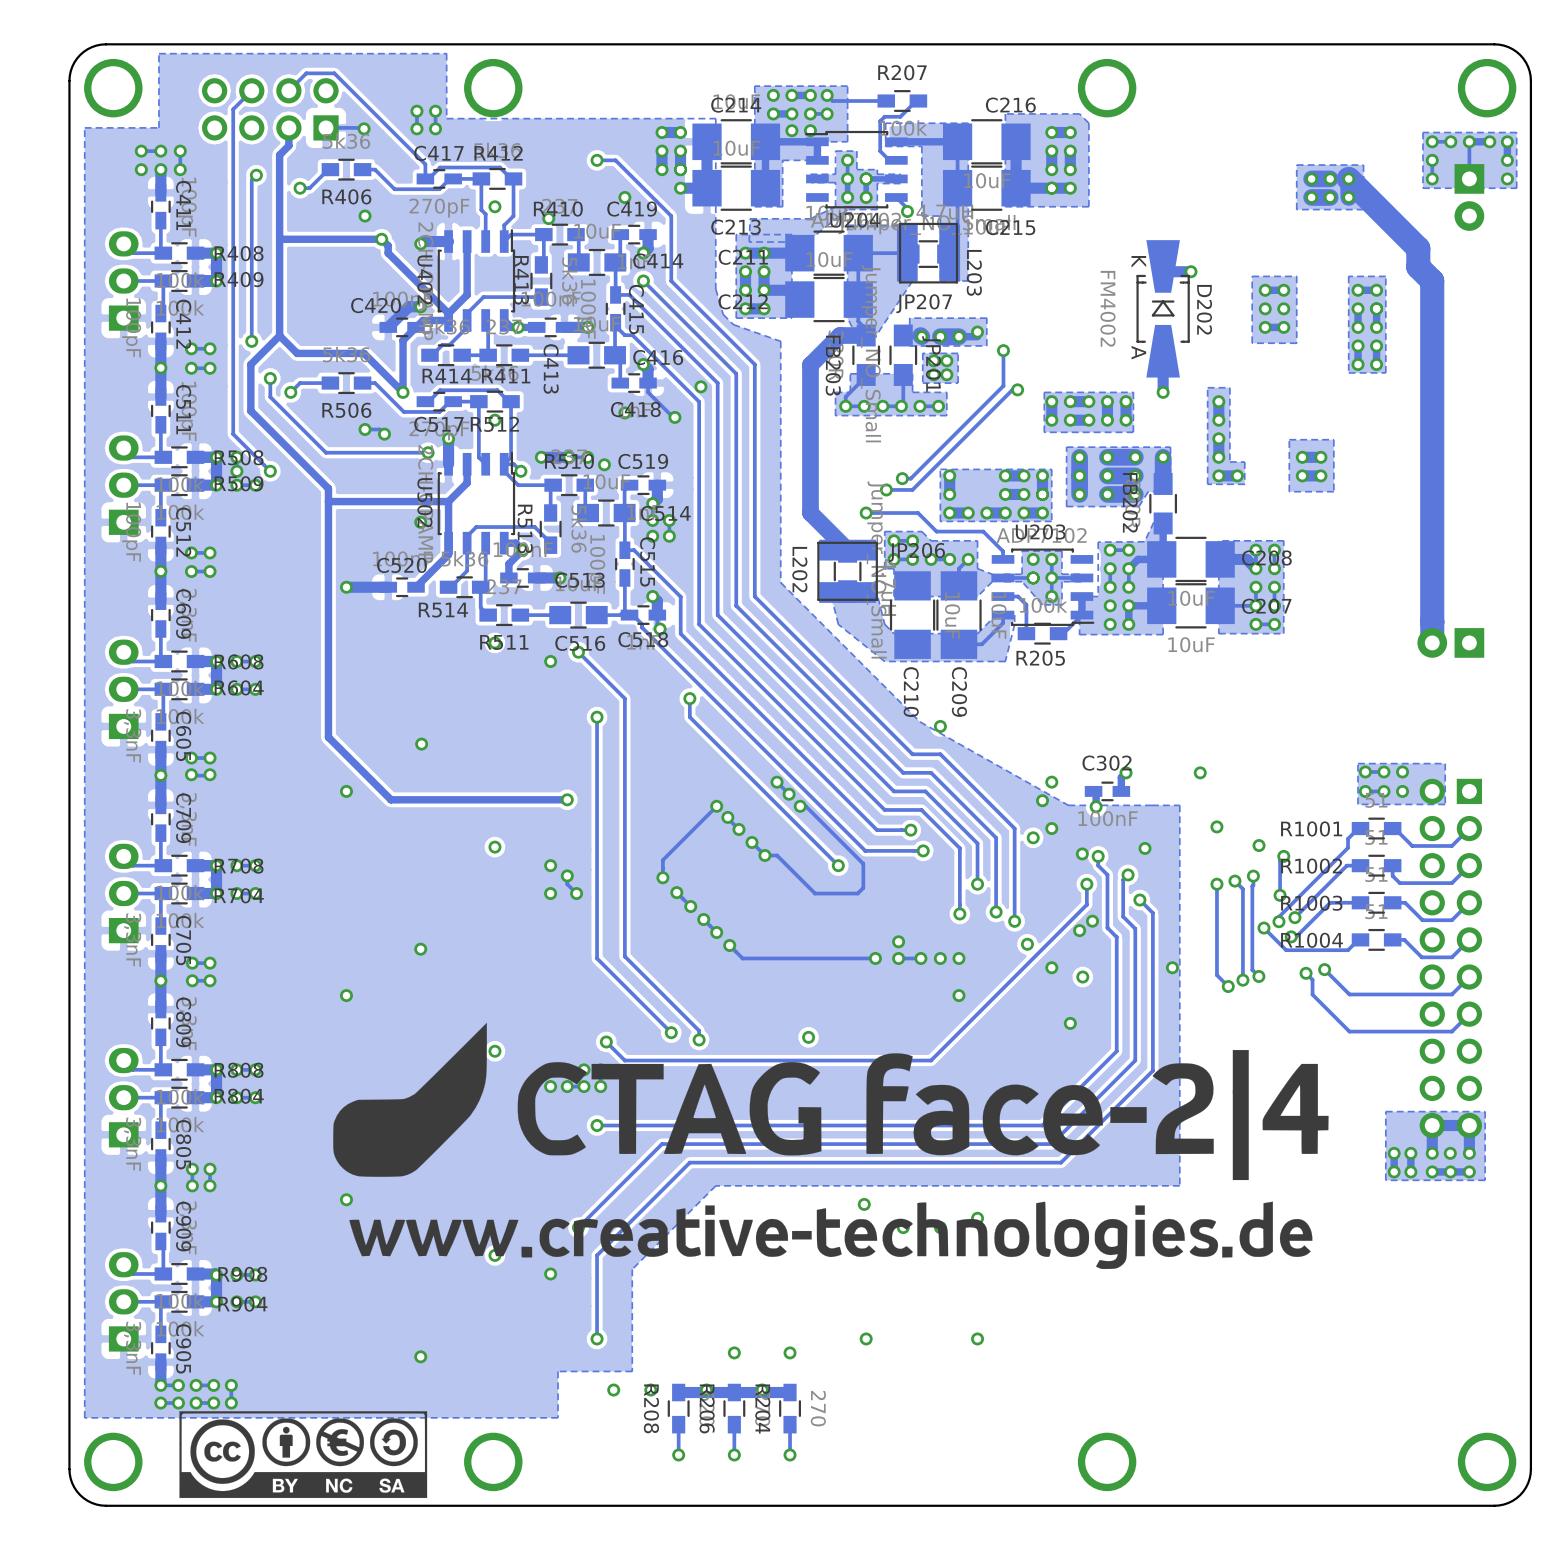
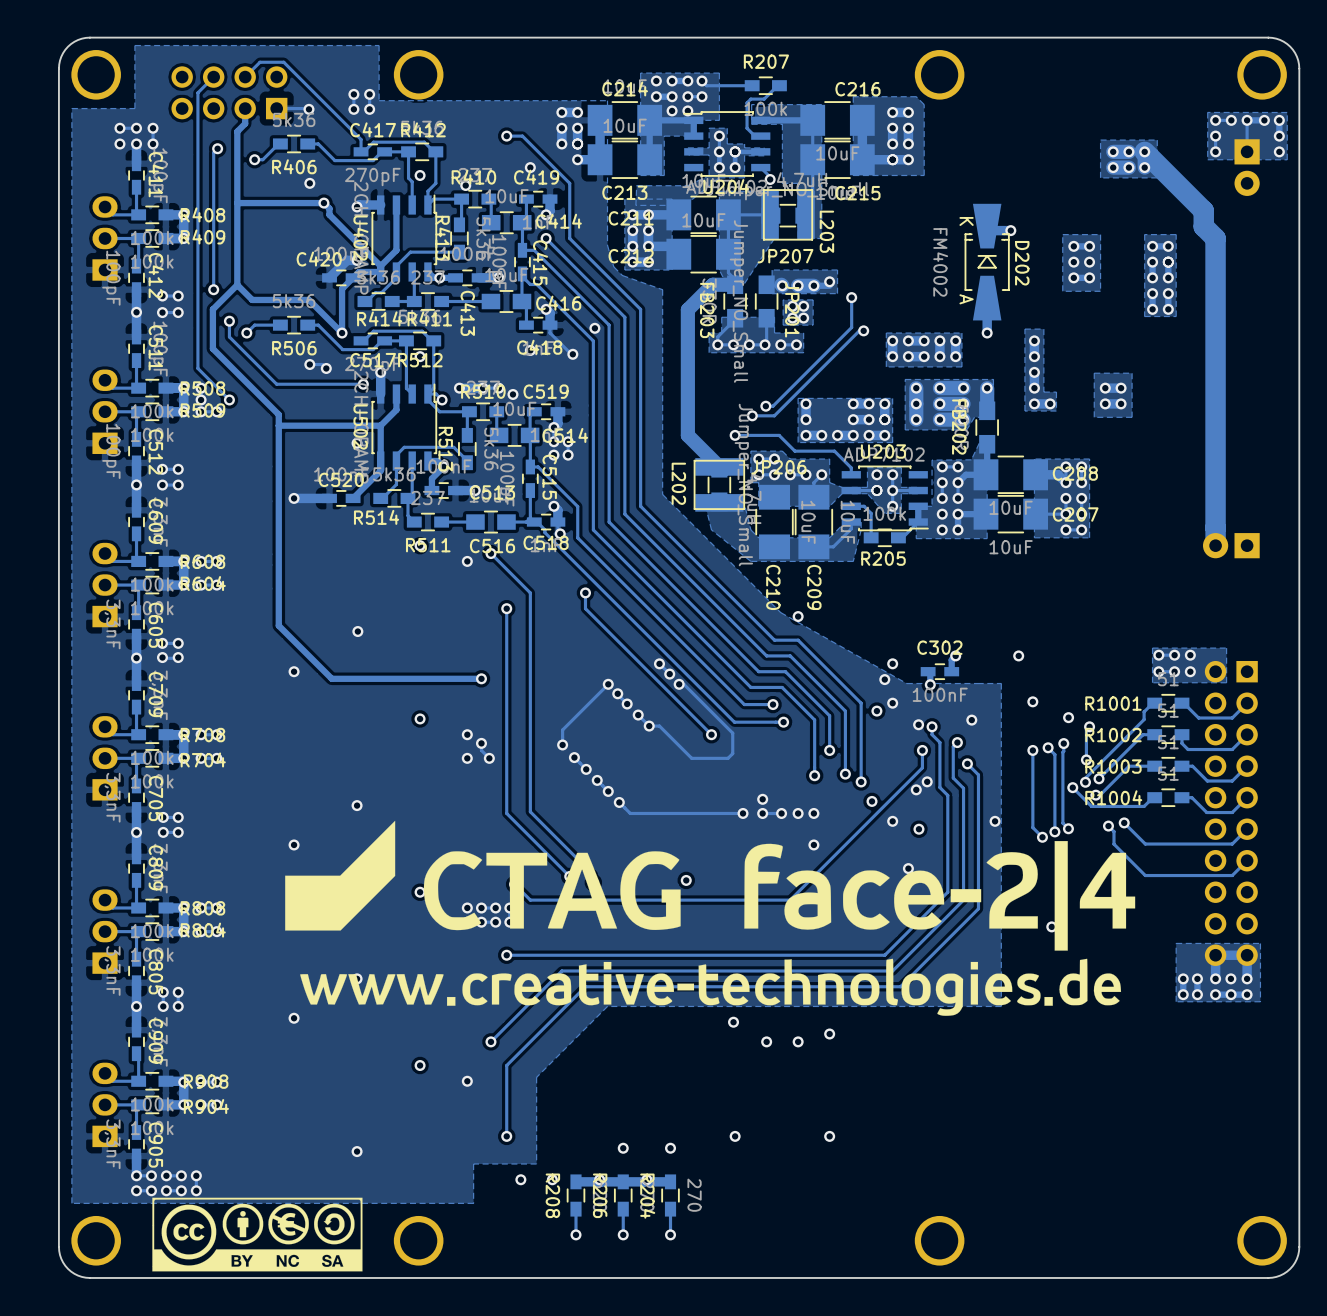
drawing: none -> [285, 820, 1136, 1016]
drawing: [333, 1022, 1329, 1270] -> none

